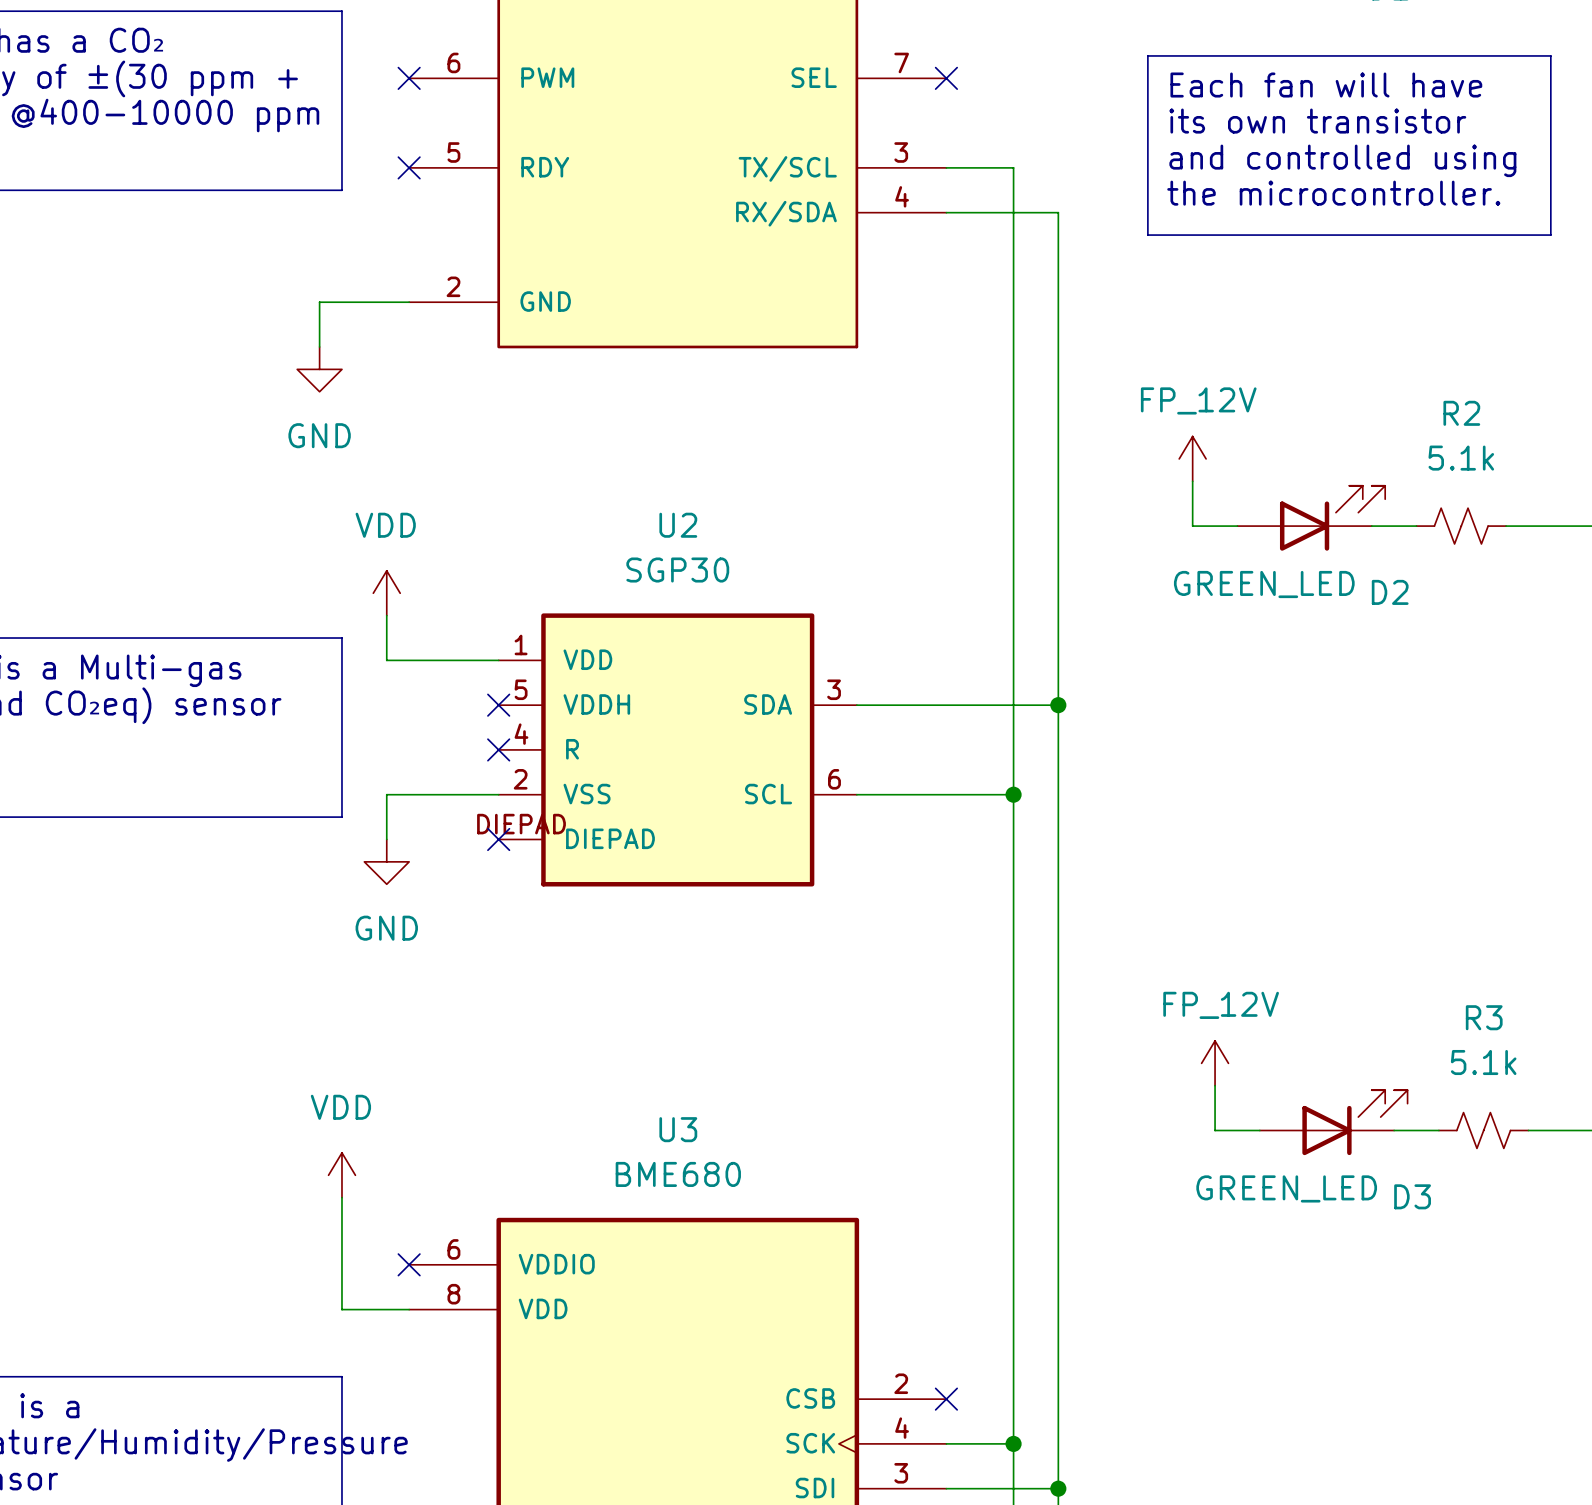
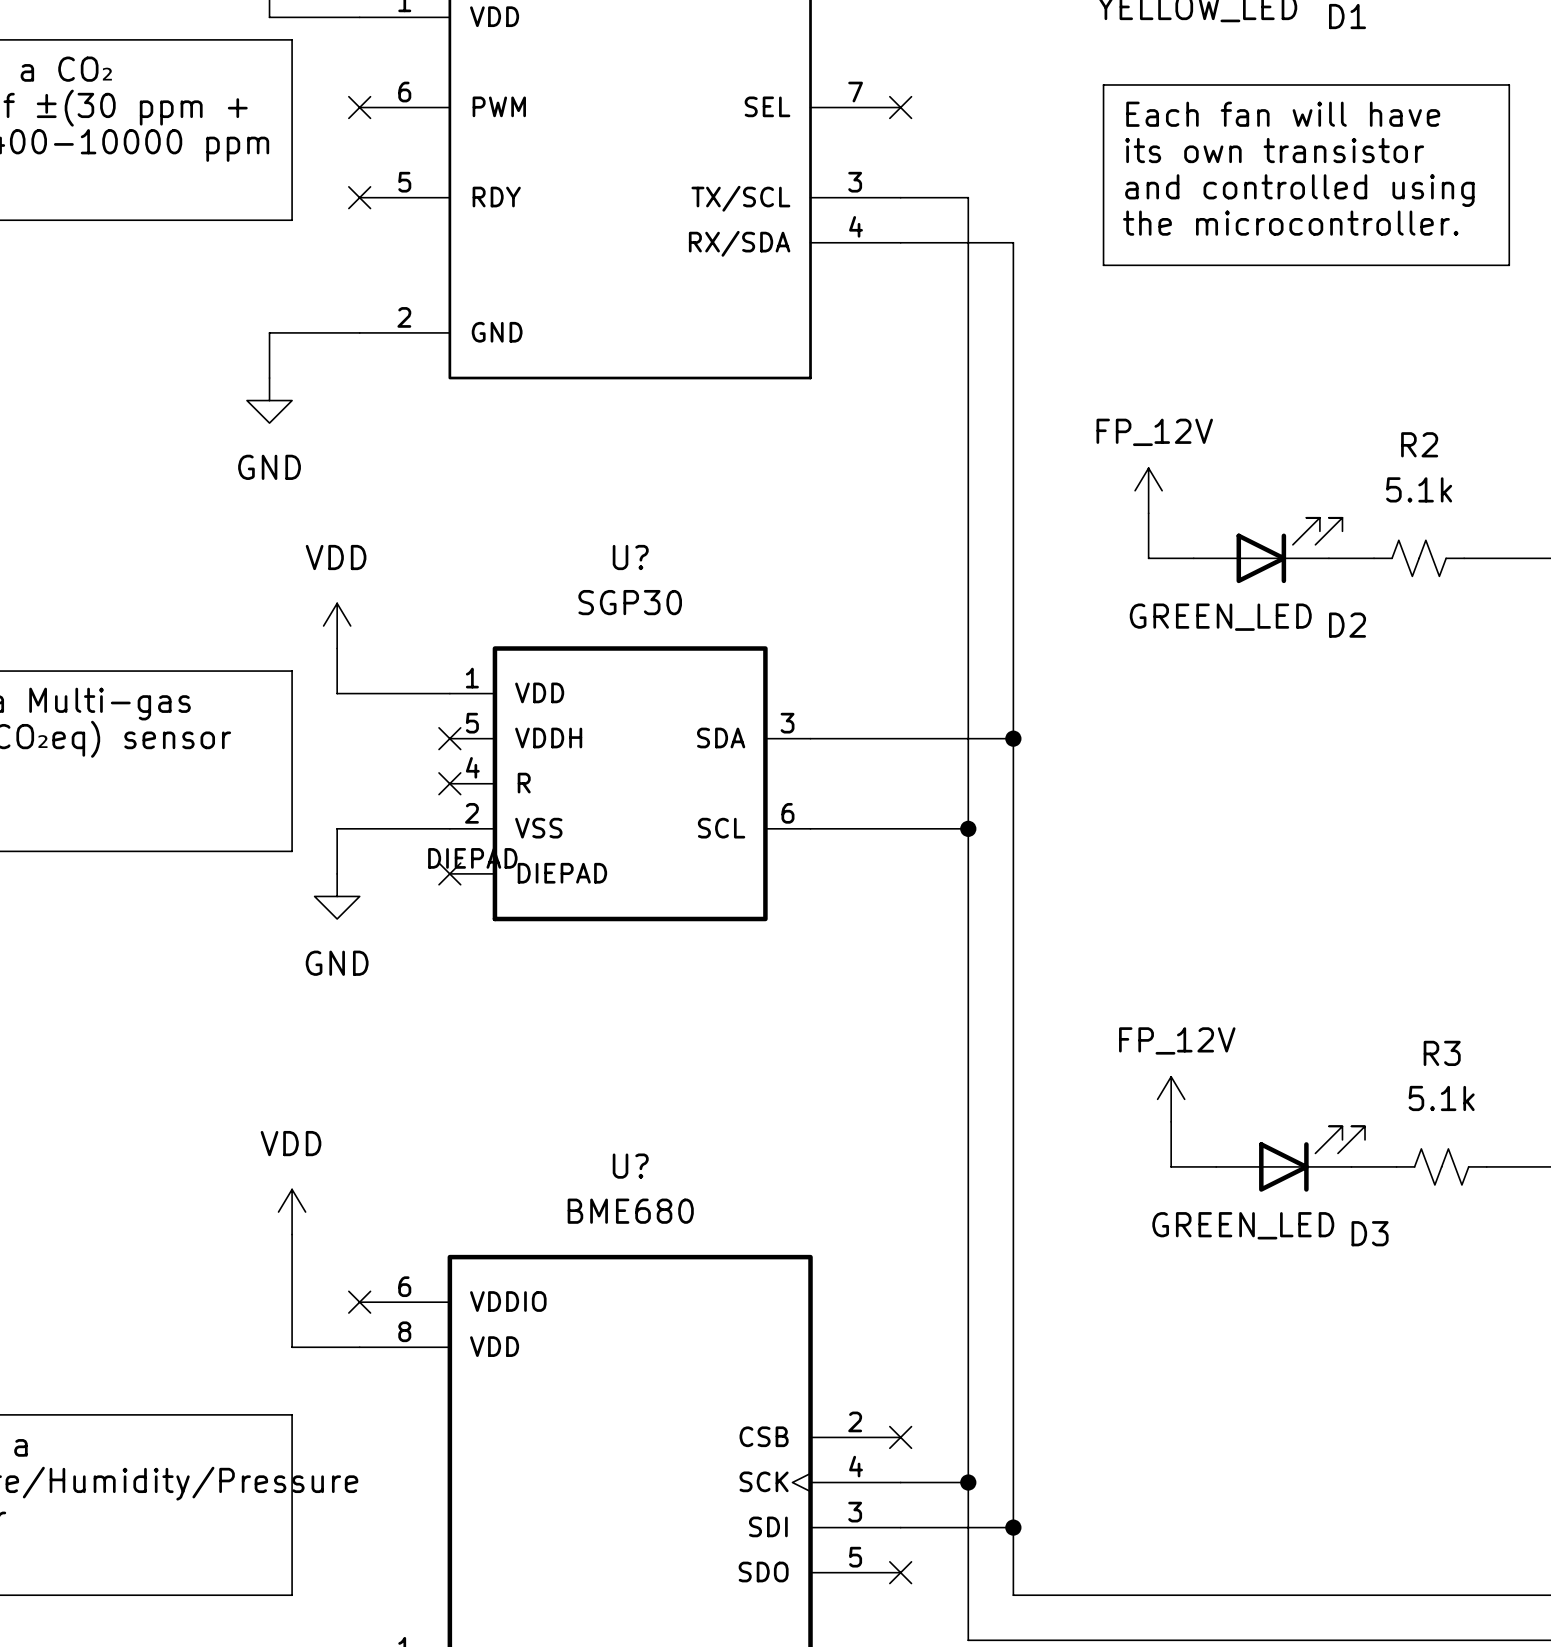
U2 name: U2 (678, 525) -> U? (630, 557)
U3 name: U3 (678, 1129) -> U? (630, 1166)

